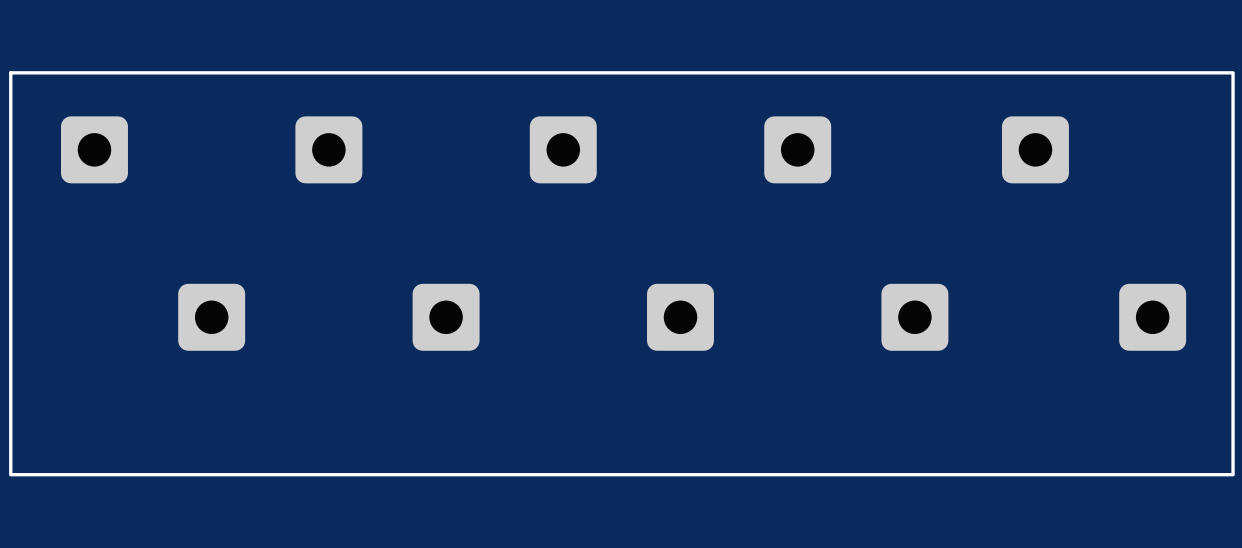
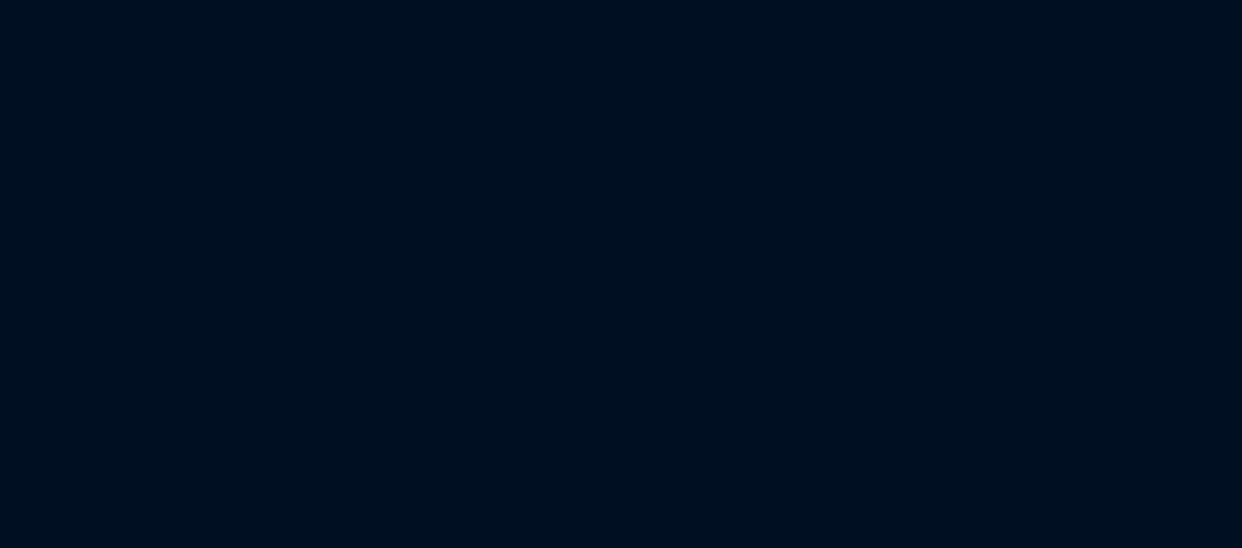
part: (621, 273) -> none

